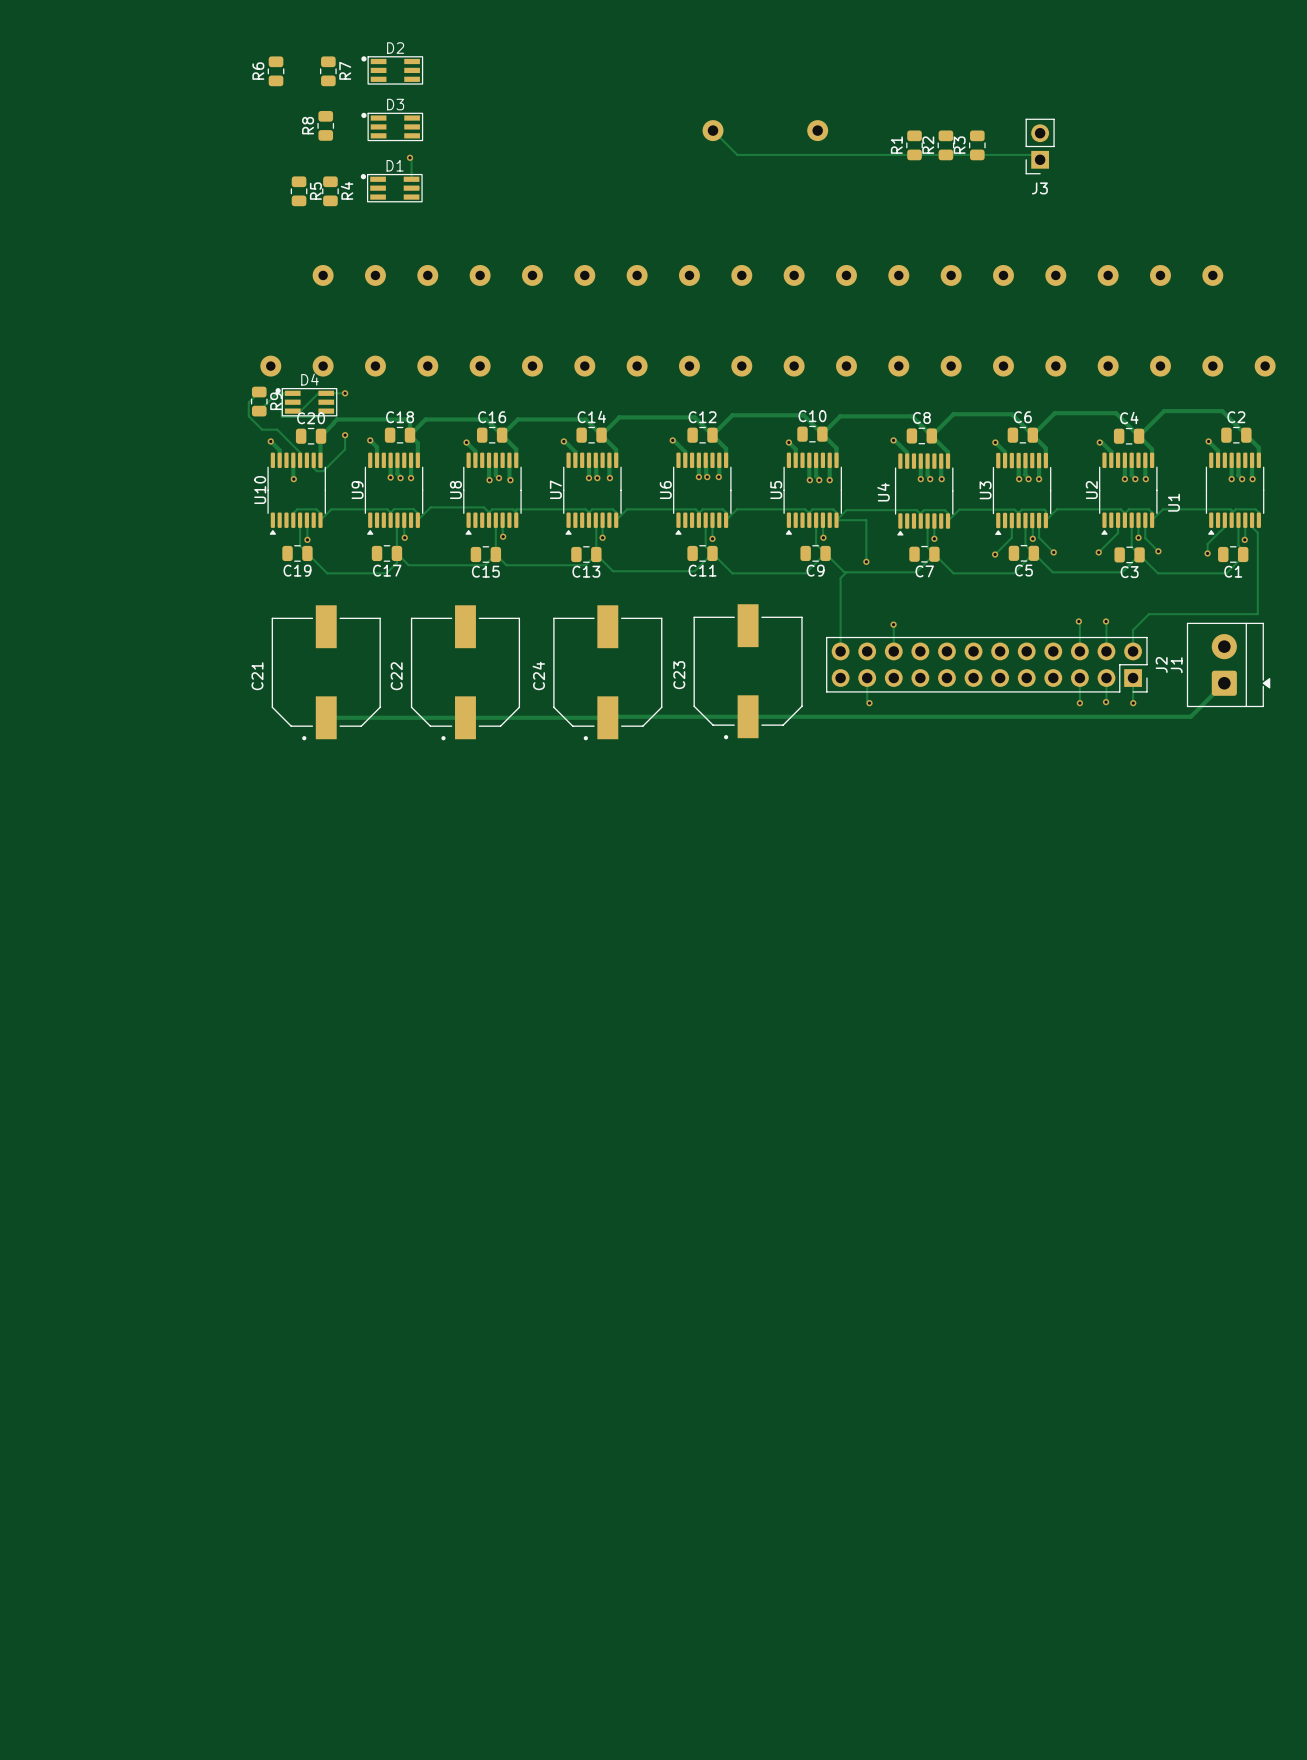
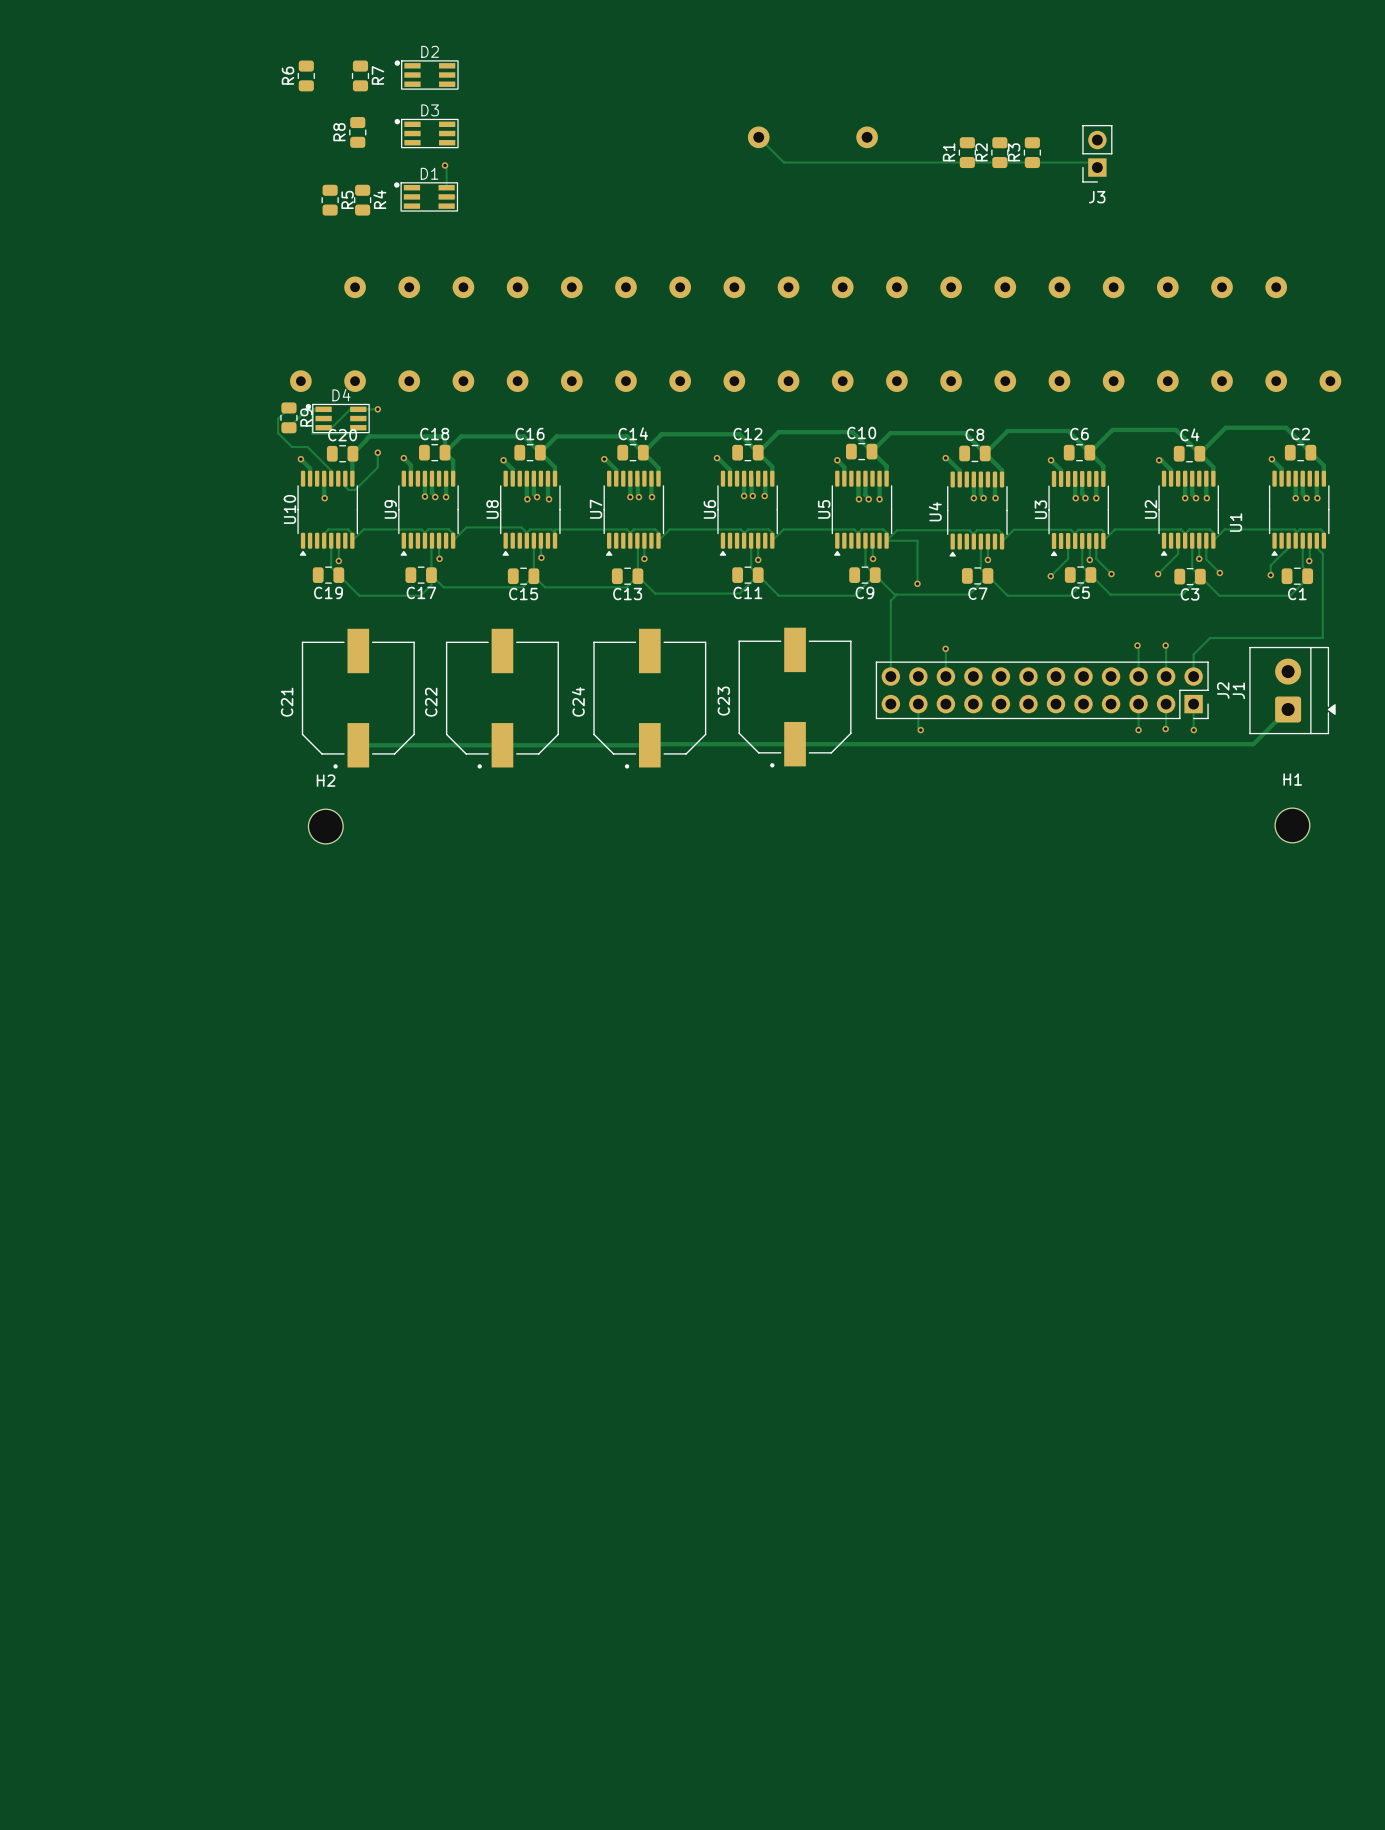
H1: none -> (1292, 825)
H2: none -> (325, 826)

